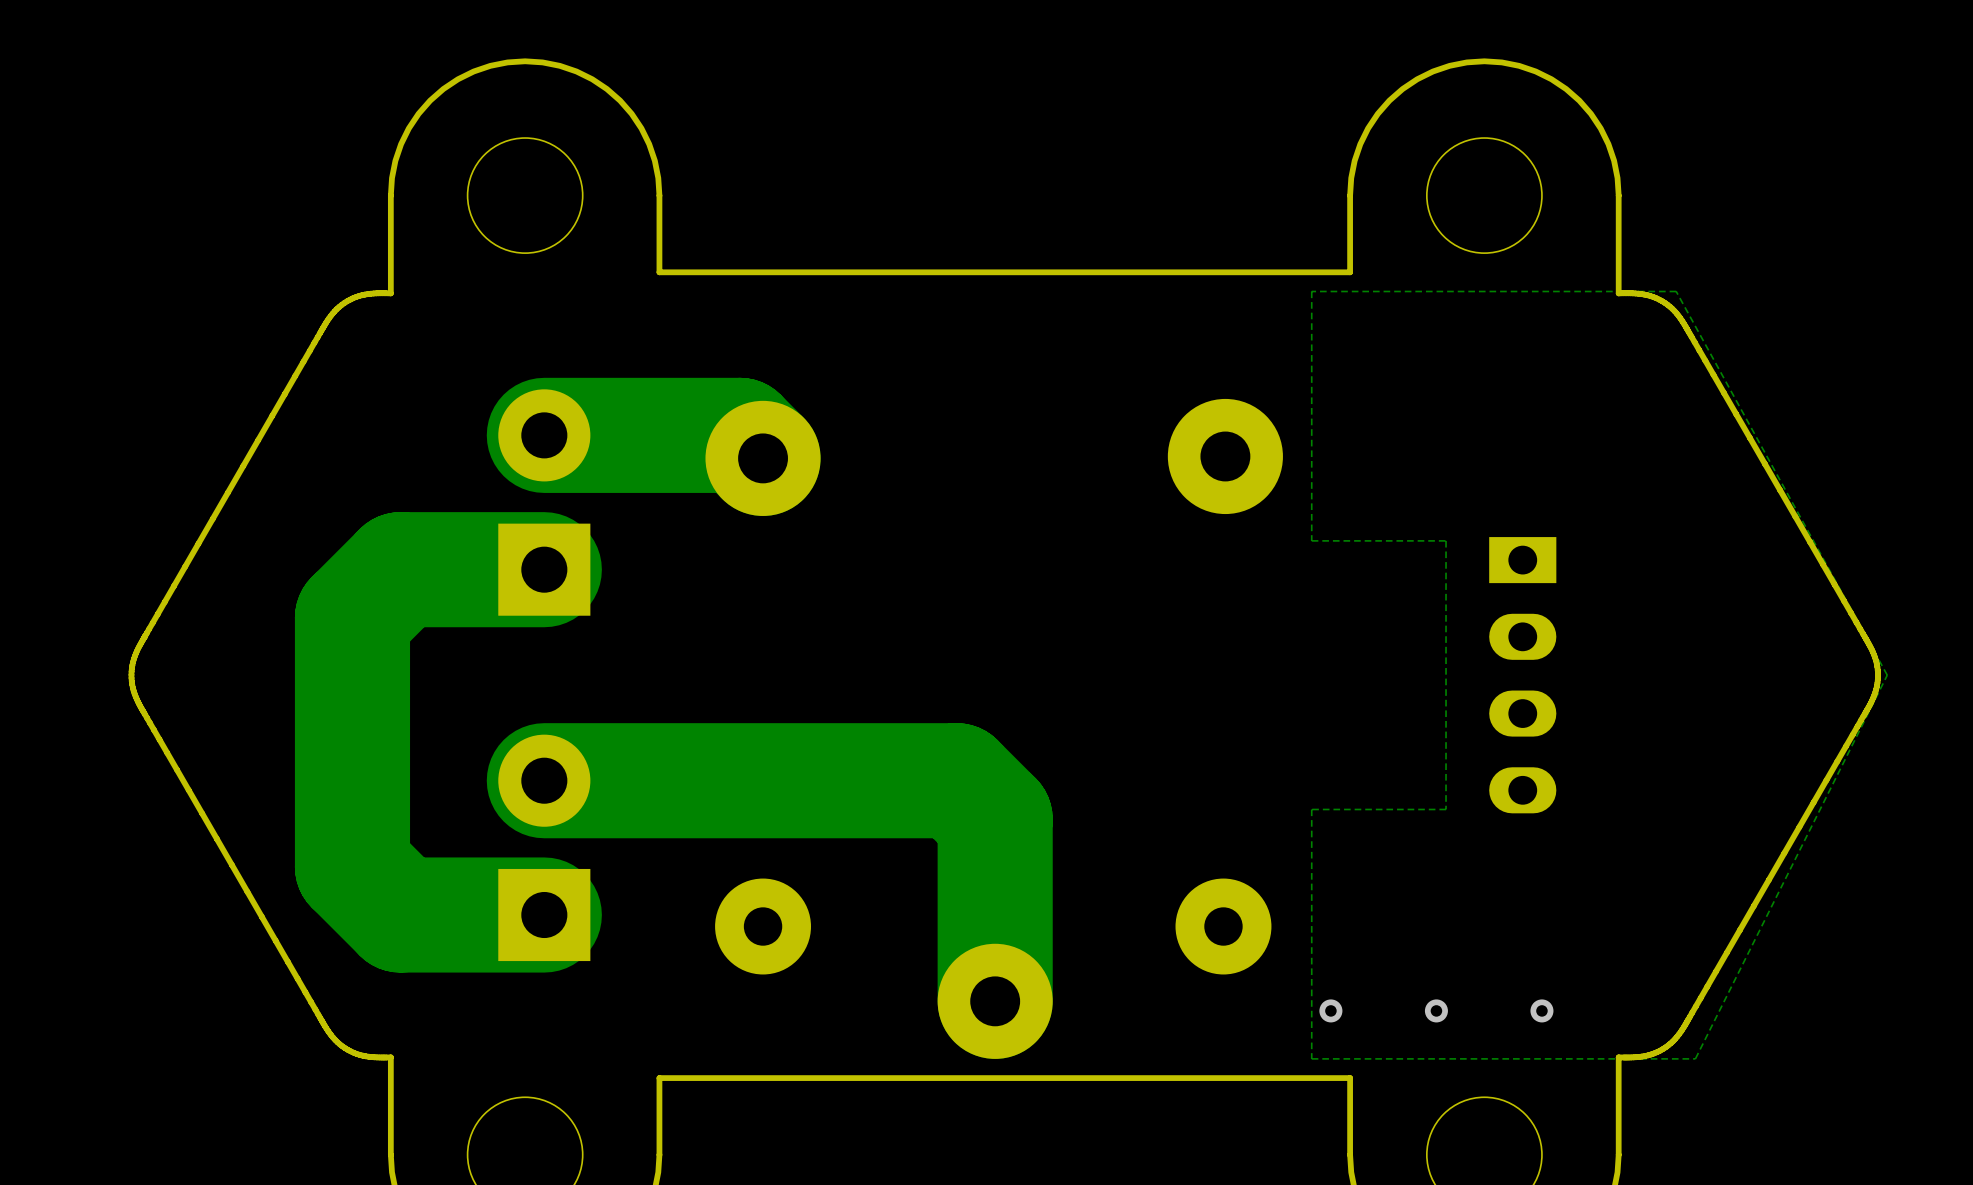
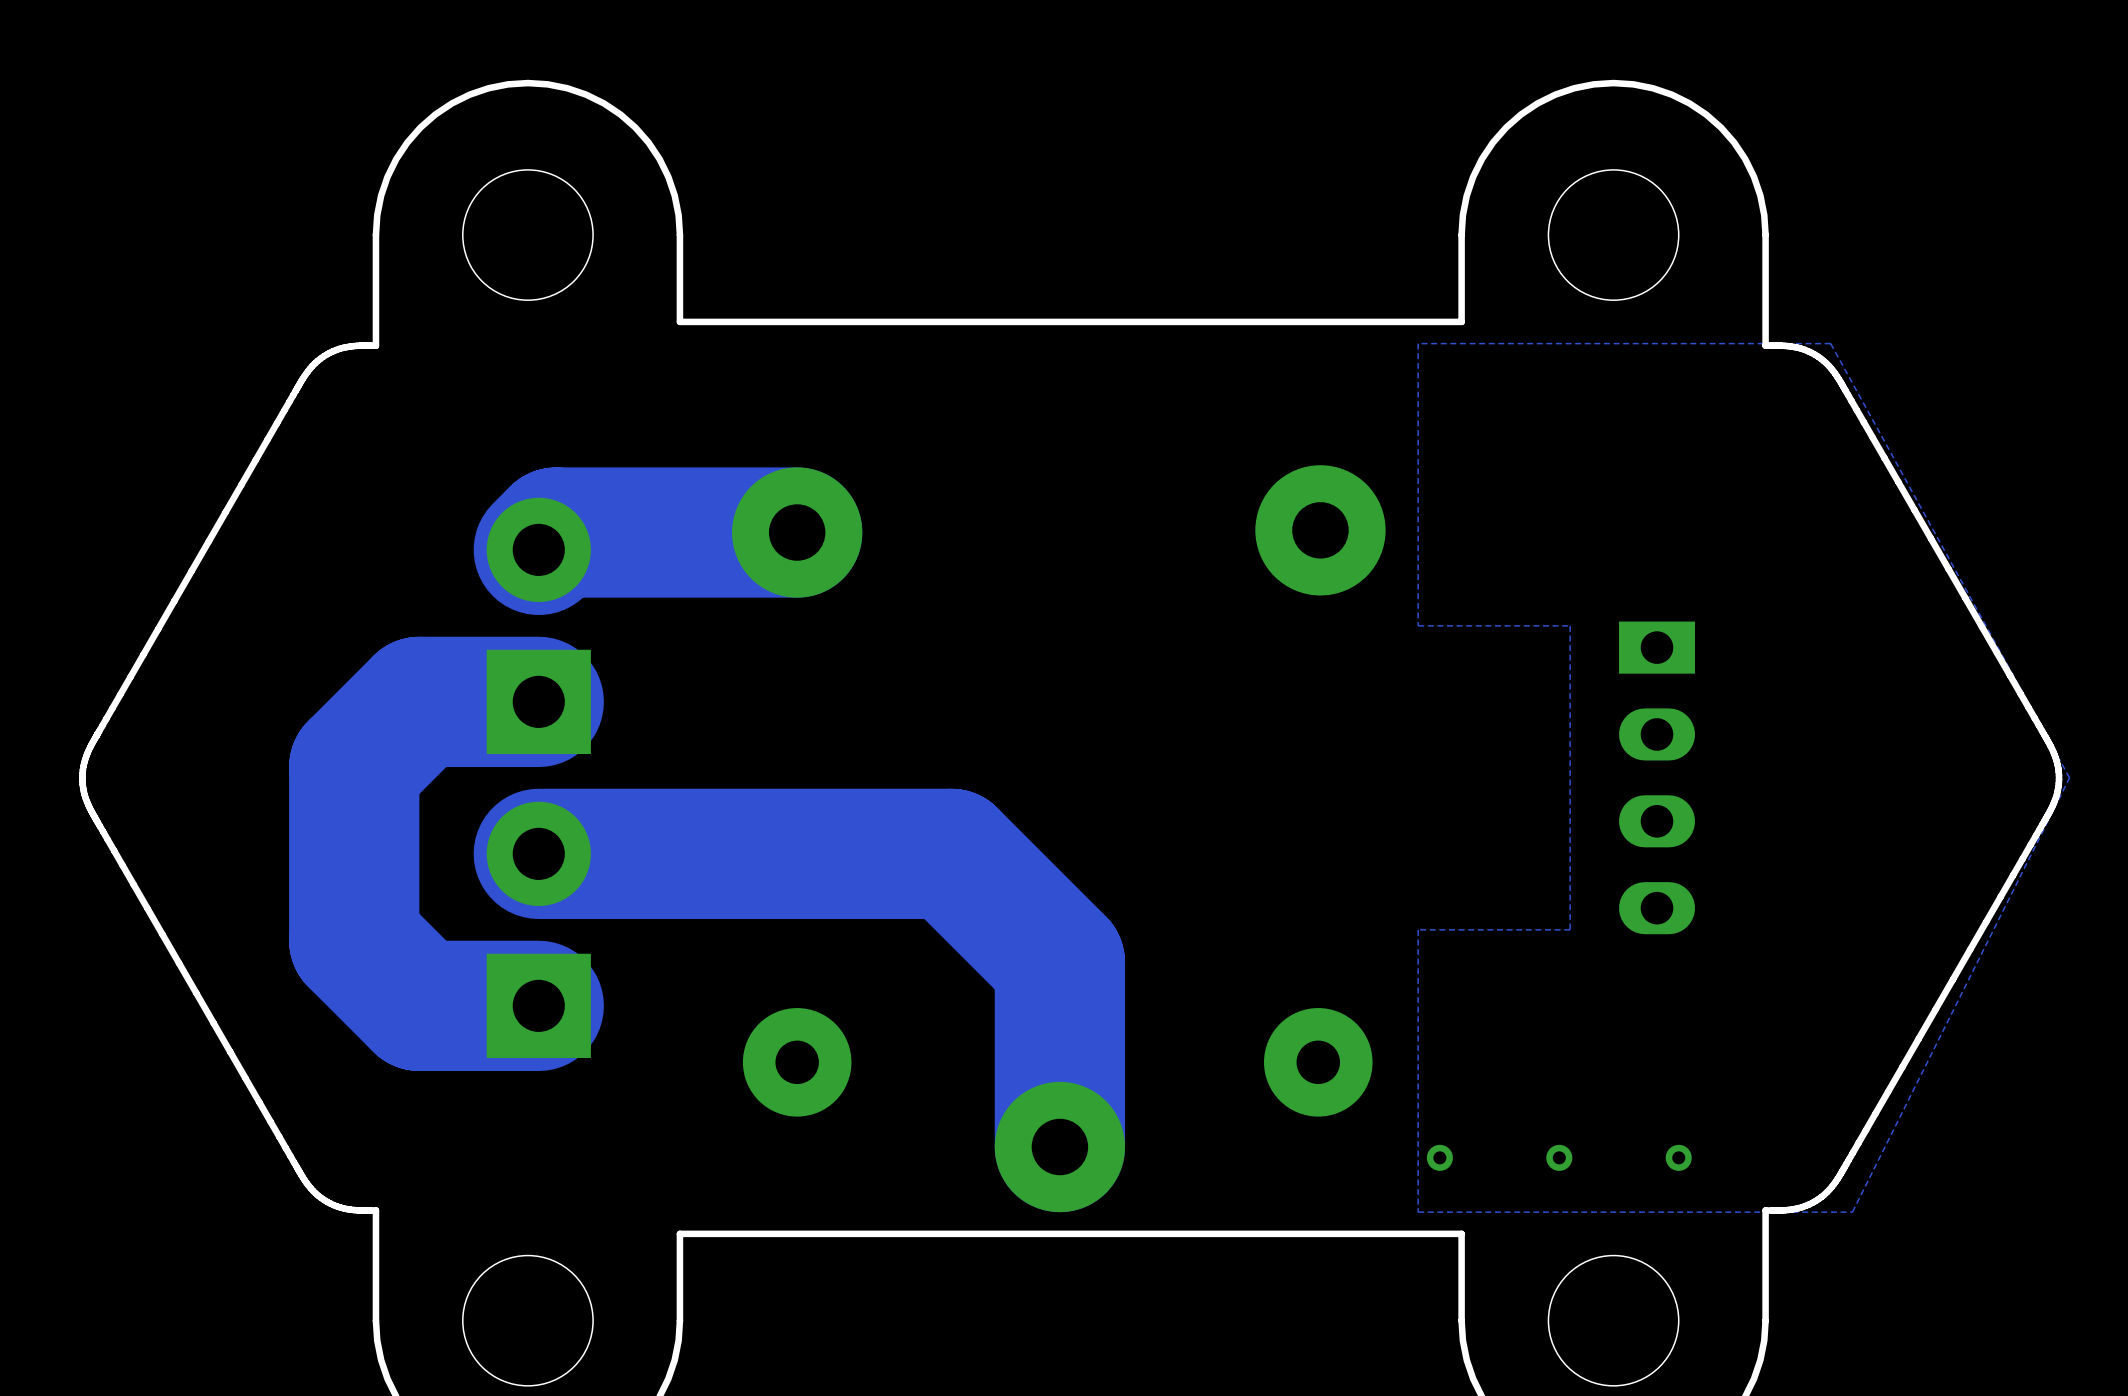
track: (544, 435) (740, 435) (763, 458) -> (538, 549) (556, 532) (797, 532)
part position: (544, 502) -> (538, 625)
track: (544, 569) (400, 569) (352, 617) (352, 867) (400, 915) (544, 915) -> none
track: none -> (538, 701) (419, 701) (354, 767) (354, 940) (419, 1005) (538, 1005)
track: (544, 780) (956, 780) (995, 819) (995, 838) -> (538, 853) (951, 853) (1059, 962)
part position: (544, 847) -> (538, 929)

